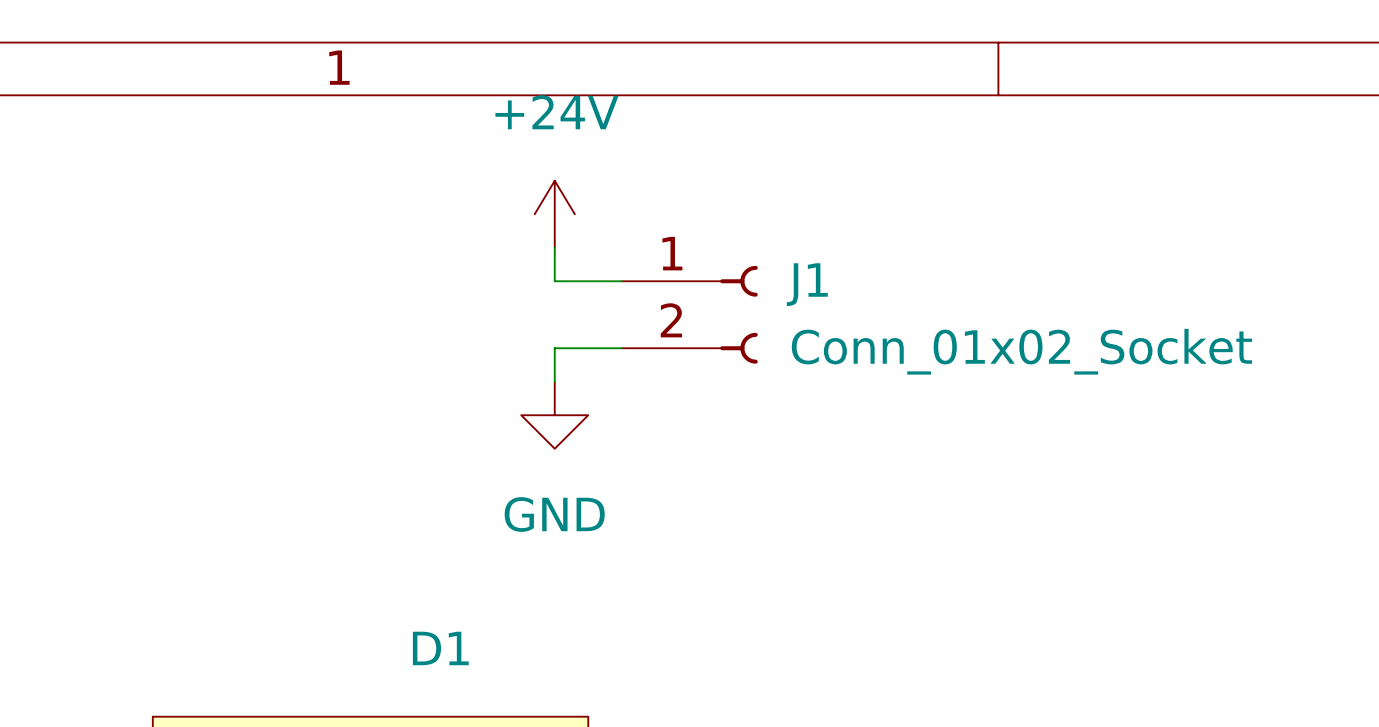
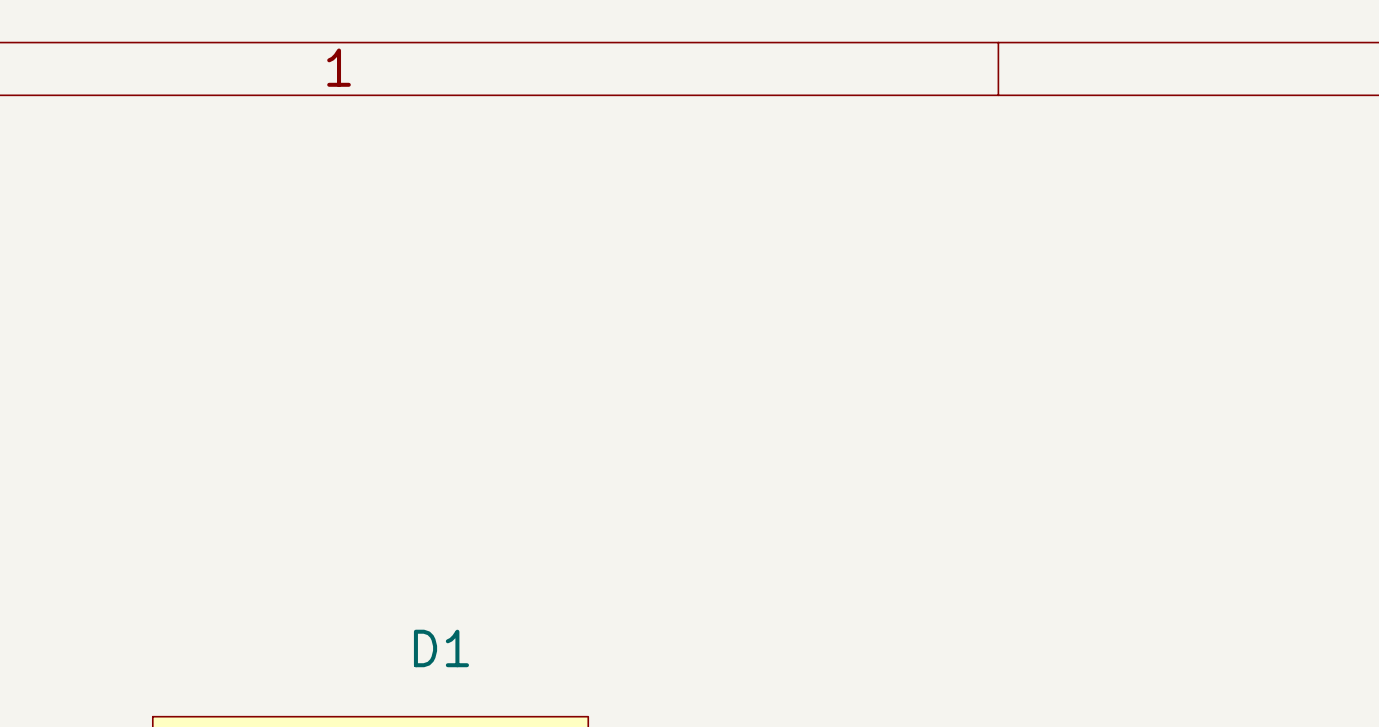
power symbol: +24V (554, 214) -> none
wire: (554, 247) (554, 281) (621, 281) -> none
J1: Conn_01x02_Socket (689, 314) -> none
wire: (621, 348) (554, 348) (554, 381) -> none
power symbol: GND (554, 415) -> none

